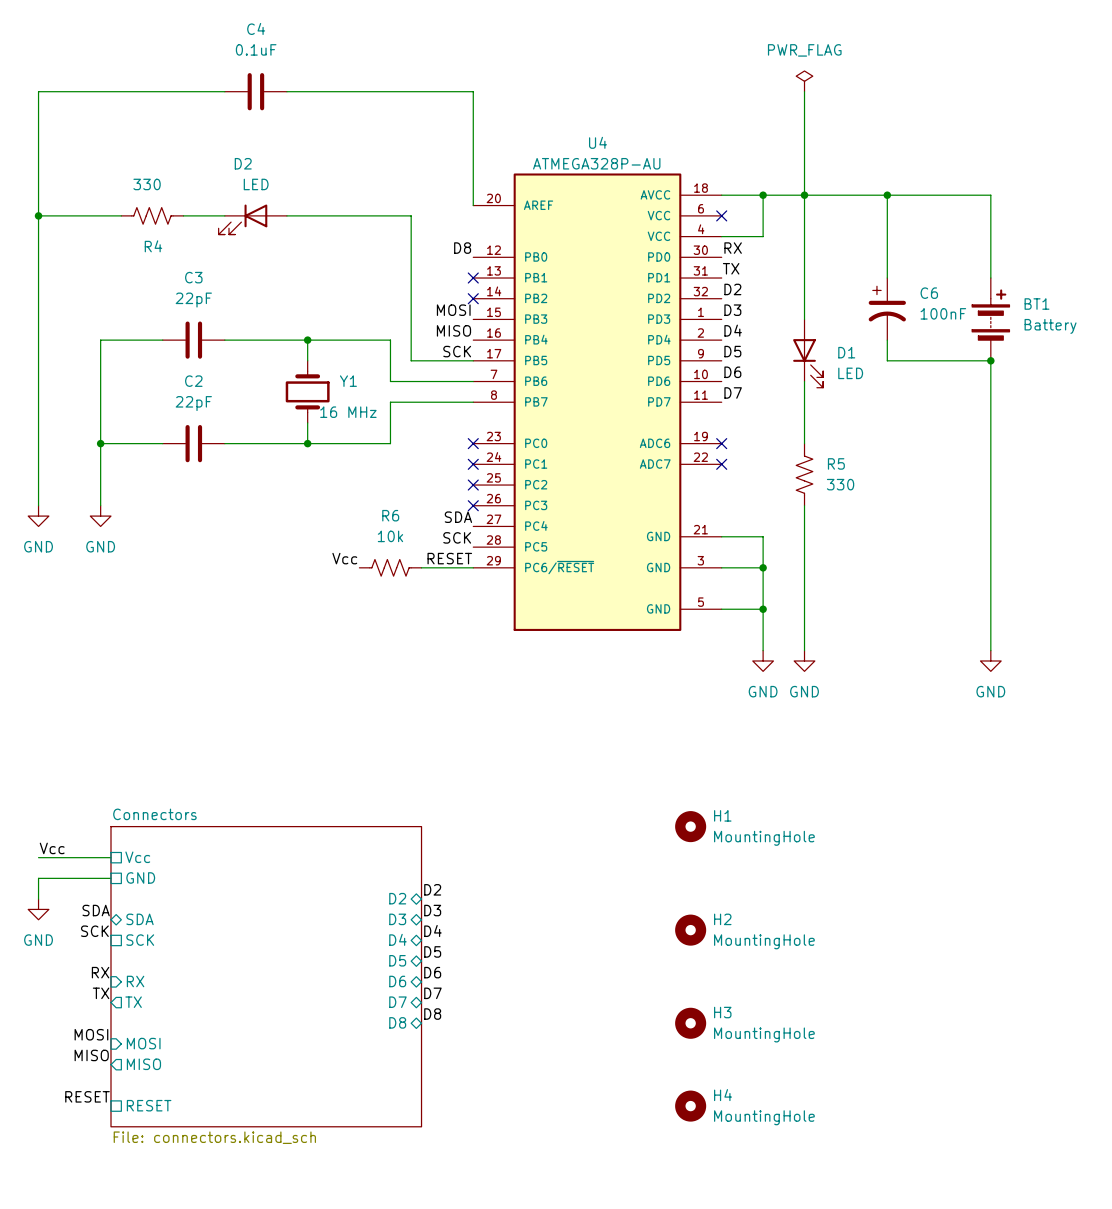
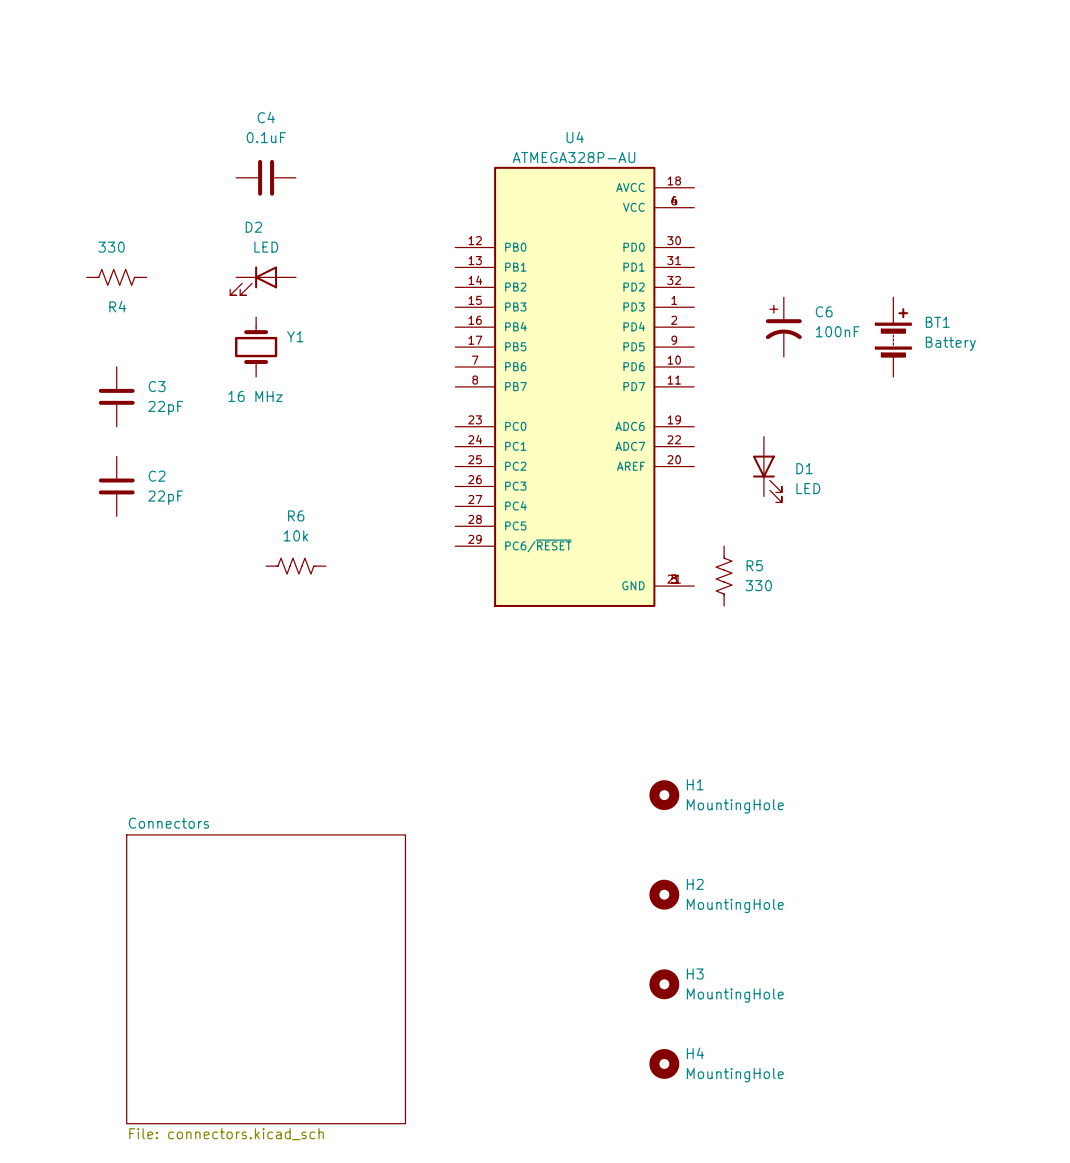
power symbol: PWR_FLAG (804, 81) -> none
wire: (224, 91) (38, 91) (38, 505) -> none
C4 position: (255, 91) -> (266, 177)
wire: (286, 91) (473, 91) (473, 205) -> none
wire: (804, 91) (804, 319) -> none
U4 symbol: [473, 173, 722, 631] -> [455, 166, 695, 607]
wire: (721, 195) (990, 195) (990, 278) -> none
wire: (763, 195) (763, 236) (721, 236) -> none
junction: (763, 195) -> none
junction: (804, 195) -> none
wire: (887, 195) (887, 278) -> none
junction: (887, 195) -> none
wire: (38, 215) (121, 215) -> none
junction: (38, 215) -> none
R4 position: (152, 215) -> (116, 277)
wire: (183, 215) (224, 215) -> none
wire: (286, 215) (411, 215) (411, 360) (473, 360) -> none
no-connect mark: (721, 215) -> none
D2 position: (252, 219) -> (263, 280)
label: D8 (462, 248) -> none
label: RX (733, 248) -> none
label: TX (731, 268) -> none
C3 name position: C3 (193, 277) -> C3 (157, 386)
no-connect mark: (473, 278) -> none
label: D2 (732, 289) -> none
no-connect mark: (473, 298) -> none
C6 position: (887, 309) -> (783, 327)
label: MOSI (453, 310) -> none
label: D3 (732, 310) -> none
BT1 position: (990, 319) -> (893, 337)
label: MISO (453, 330) -> none
label: D4 (733, 330) -> none
wire: (162, 340) (100, 340) (100, 505) -> none
C3 rotation: 0° (193, 340) -> 90° clockwise (116, 396)
C3 position: (193, 340) -> (116, 396)
wire: (224, 340) (390, 340) (390, 381) (473, 381) -> none
wire: (307, 340) (307, 360) -> none
junction: (307, 340) -> none
wire: (887, 340) (887, 360) (990, 360) (990, 650) -> none
label: SCK (457, 351) -> none
label: D5 (732, 351) -> none
D1 position: (808, 353) -> (767, 469)
junction: (990, 360) -> none
label: D6 (732, 372) -> none
C2 name position: C2 (193, 381) -> C2 (157, 476)
wire: (804, 381) (804, 443) -> none
Y1 position: (307, 391) -> (256, 347)
label: D7 (733, 392) -> none
wire: (473, 402) (390, 402) (390, 443) (224, 443) -> none
Y1 value position: 16 MHz (348, 412) -> 16 MHz (255, 396)
wire: (307, 422) (307, 443) -> none
wire: (100, 443) (162, 443) -> none
junction: (100, 443) -> none
C2 rotation: 0° (193, 443) -> 90° clockwise (116, 486)
C2 position: (193, 443) -> (116, 486)
junction: (307, 443) -> none
no-connect mark: (473, 443) -> none
no-connect mark: (721, 443) -> none
no-connect mark: (473, 464) -> none
no-connect mark: (721, 464) -> none
R5 position: (804, 474) -> (724, 576)
no-connect mark: (473, 485) -> none
no-connect mark: (473, 505) -> none
wire: (804, 505) (804, 650) -> none
power symbol: GND (38, 516) -> none
power symbol: GND (100, 516) -> none
label: SDA (458, 517) -> none
wire: (721, 536) (763, 536) (763, 650) -> none
label: SCK (457, 537) -> none
label: Vcc (344, 558) -> none
label: RESET (449, 558) -> none
R6 position: (390, 567) -> (295, 566)
wire: (421, 567) (473, 567) -> none
wire: (721, 567) (763, 567) -> none
junction: (763, 567) -> none
wire: (721, 609) (763, 609) -> none
junction: (763, 609) -> none
power symbol: GND (763, 660) -> none
power symbol: GND (804, 660) -> none
power symbol: GND (990, 660) -> none
label: Vcc (52, 848) -> none
wire: (38, 857) (111, 857) -> none
sheet pin: Vcc (137, 857) -> none
sheet pin: GND (140, 877) -> none
wire: (111, 878) (38, 878) (38, 899) -> none
label: D2 (432, 889) -> none
sheet pin: D2 (397, 898) -> none
power symbol: GND (38, 909) -> none
label: SDA (96, 910) -> none
label: D3 (432, 910) -> none
sheet pin: SDA (139, 919) -> none
sheet pin: D3 (397, 919) -> none
label: D4 (432, 930) -> none
label: SCK (94, 931) -> none
sheet pin: D4 (397, 939) -> none
sheet pin: SCK (140, 940) -> none
label: D5 (432, 951) -> none
sheet pin: D5 (397, 960) -> none
label: RX (100, 972) -> none
label: D6 (432, 972) -> none
sheet Connectors: File: connectors.kicad_sch (266, 976) -> none
sheet pin: RX (135, 981) -> none
sheet pin: D6 (397, 981) -> none
label: TX (101, 993) -> none
label: D7 (432, 993) -> none
sheet pin: TX (133, 1002) -> none
sheet pin: D7 (397, 1002) -> none
label: D8 (432, 1014) -> none
sheet Connectors: none -> File: connectors.kicad_sch (266, 979)
sheet pin: D8 (397, 1022) -> none
label: MOSI (91, 1034) -> none
sheet pin: MOSI (143, 1043) -> none
label: MISO (91, 1055) -> none
sheet pin: MISO (143, 1064) -> none
label: RESET (87, 1096) -> none
sheet pin: RESET (149, 1105) -> none

